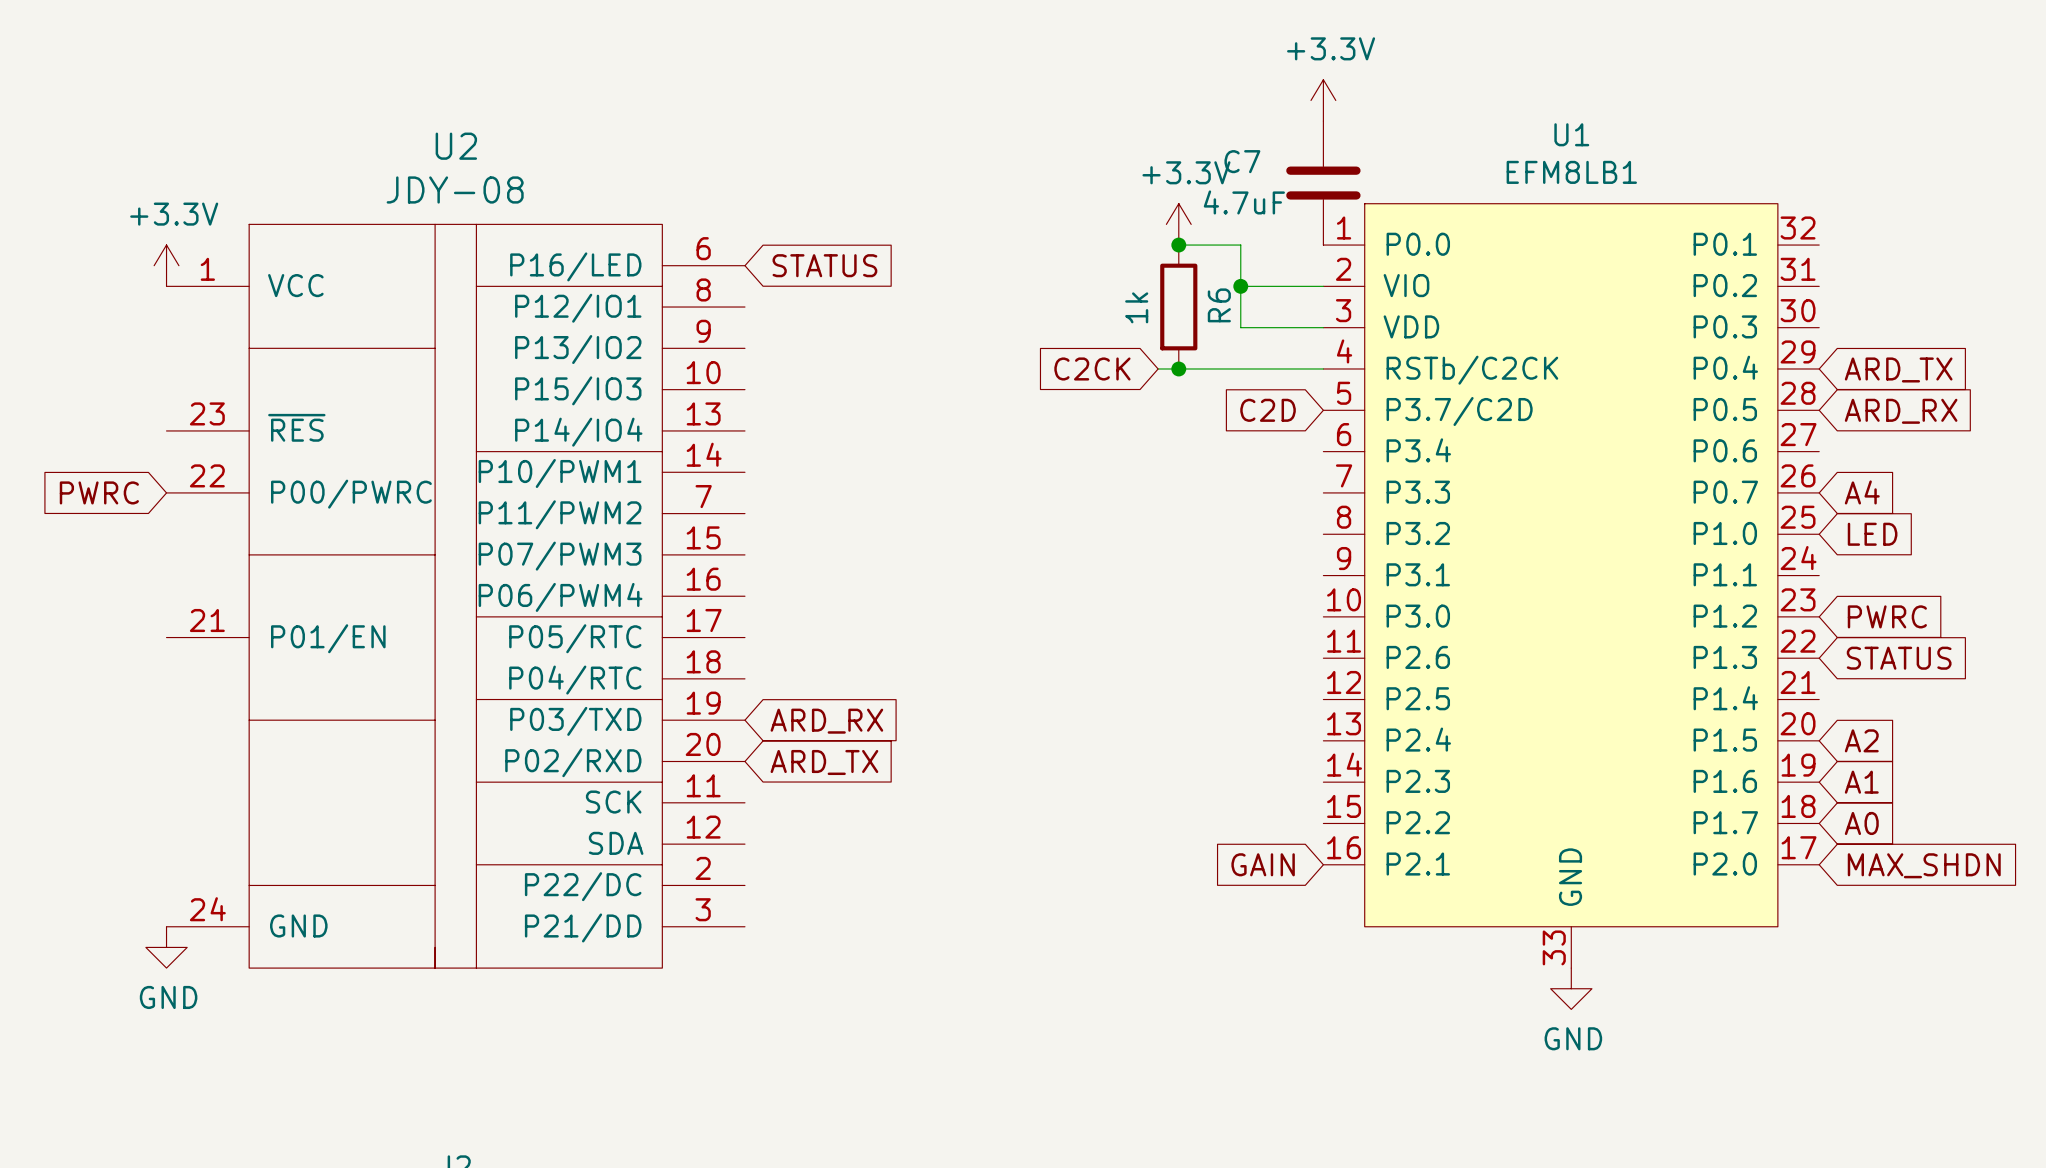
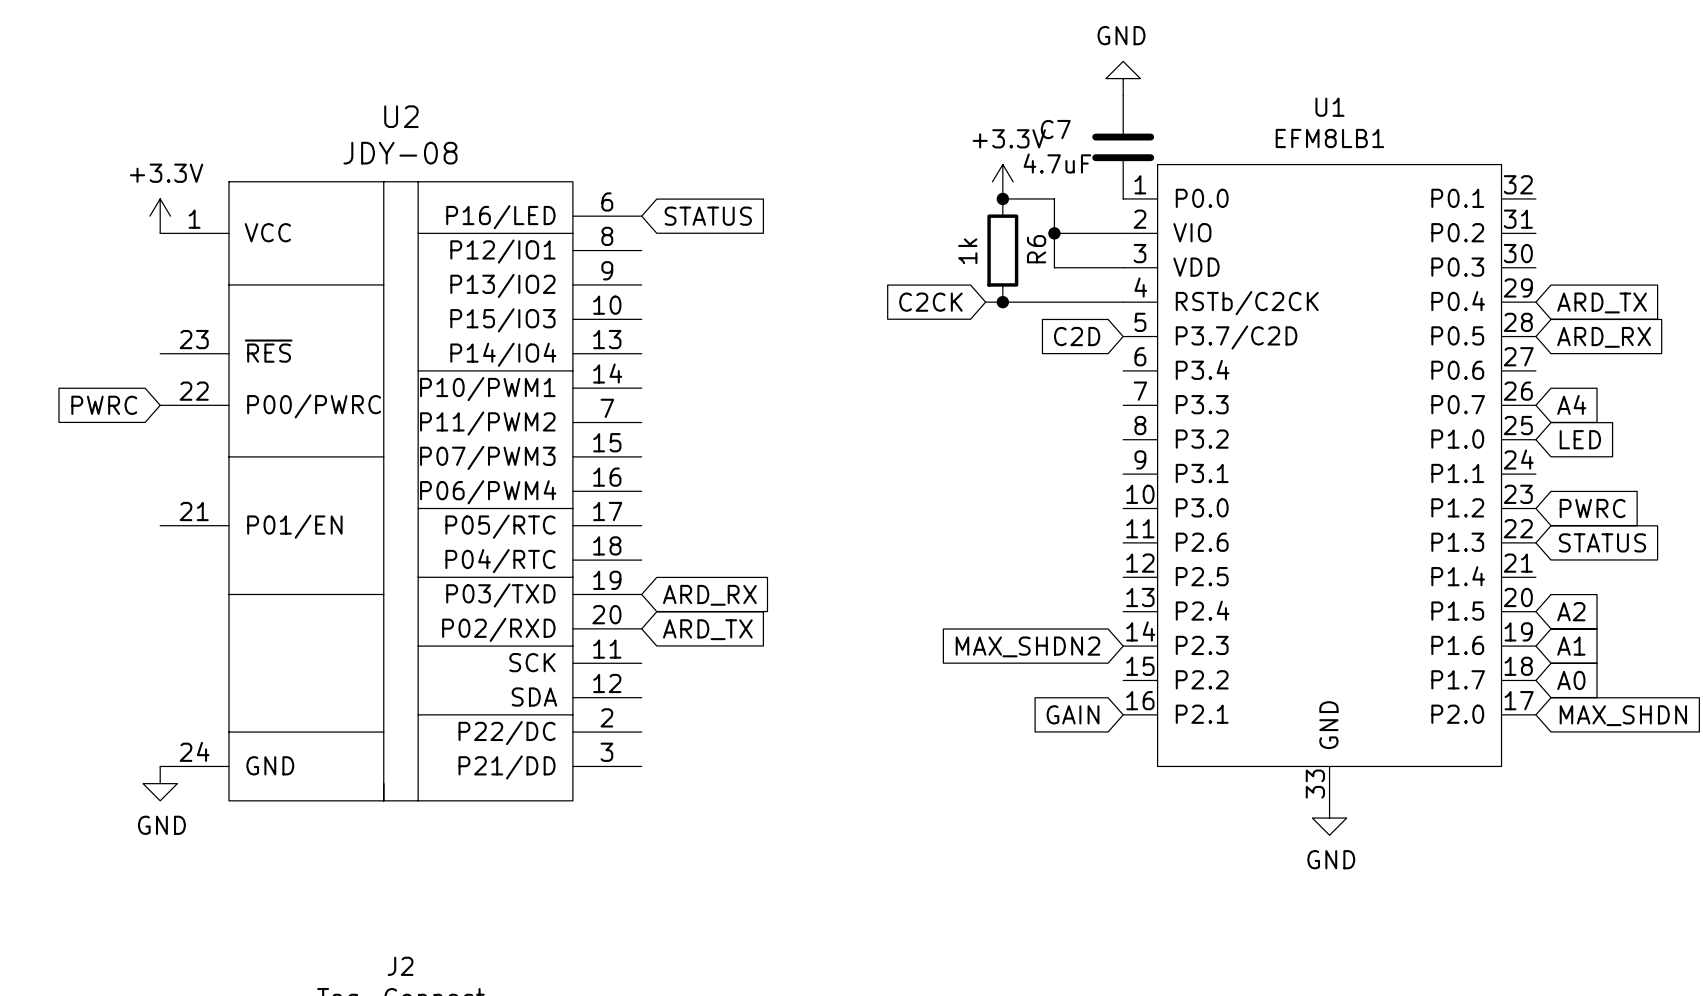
power symbol: +3.3V (1323, 100) -> GND (1123, 78)
global label: none -> MAX_SHDN2 (1027, 646)

